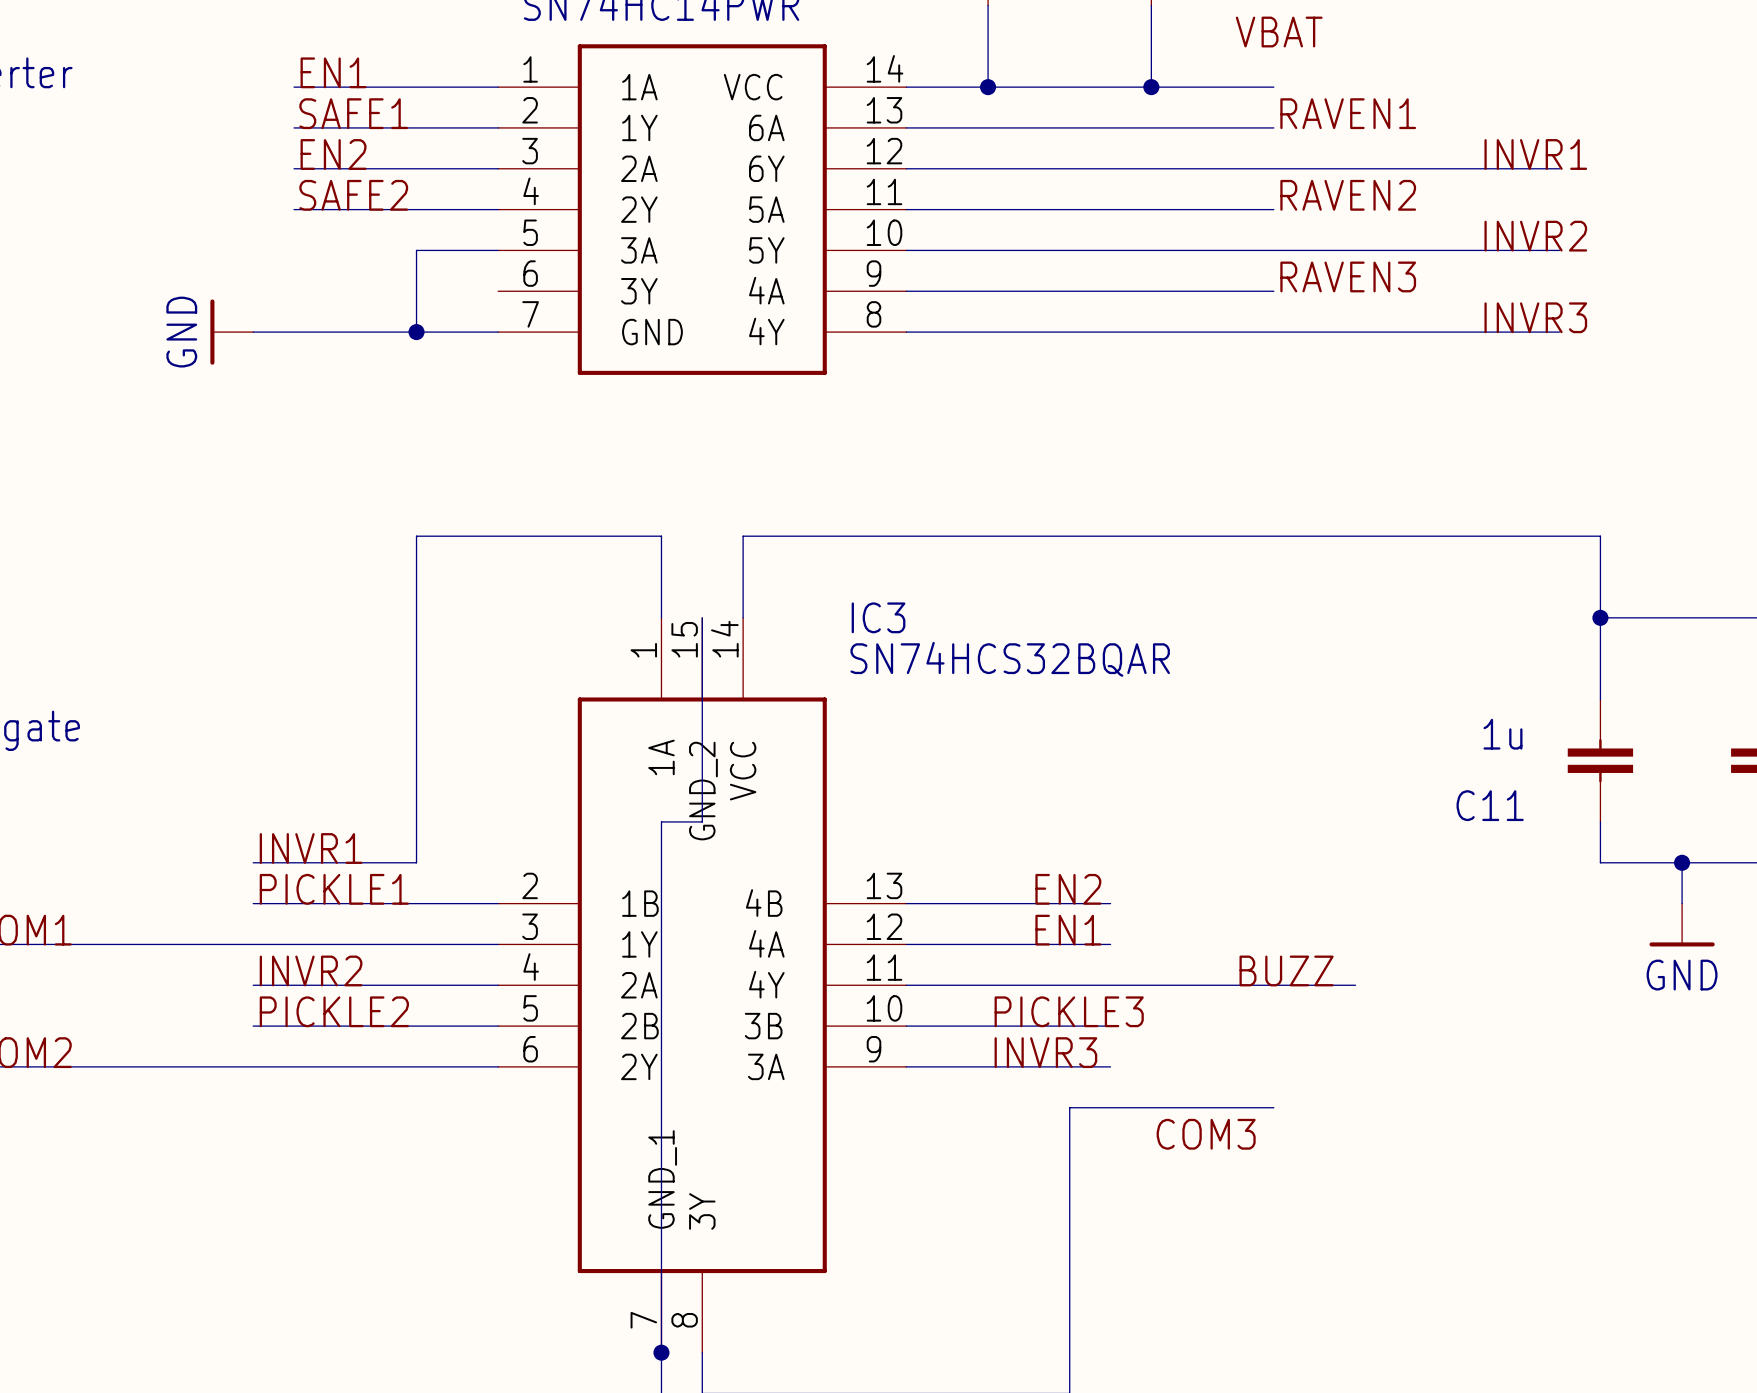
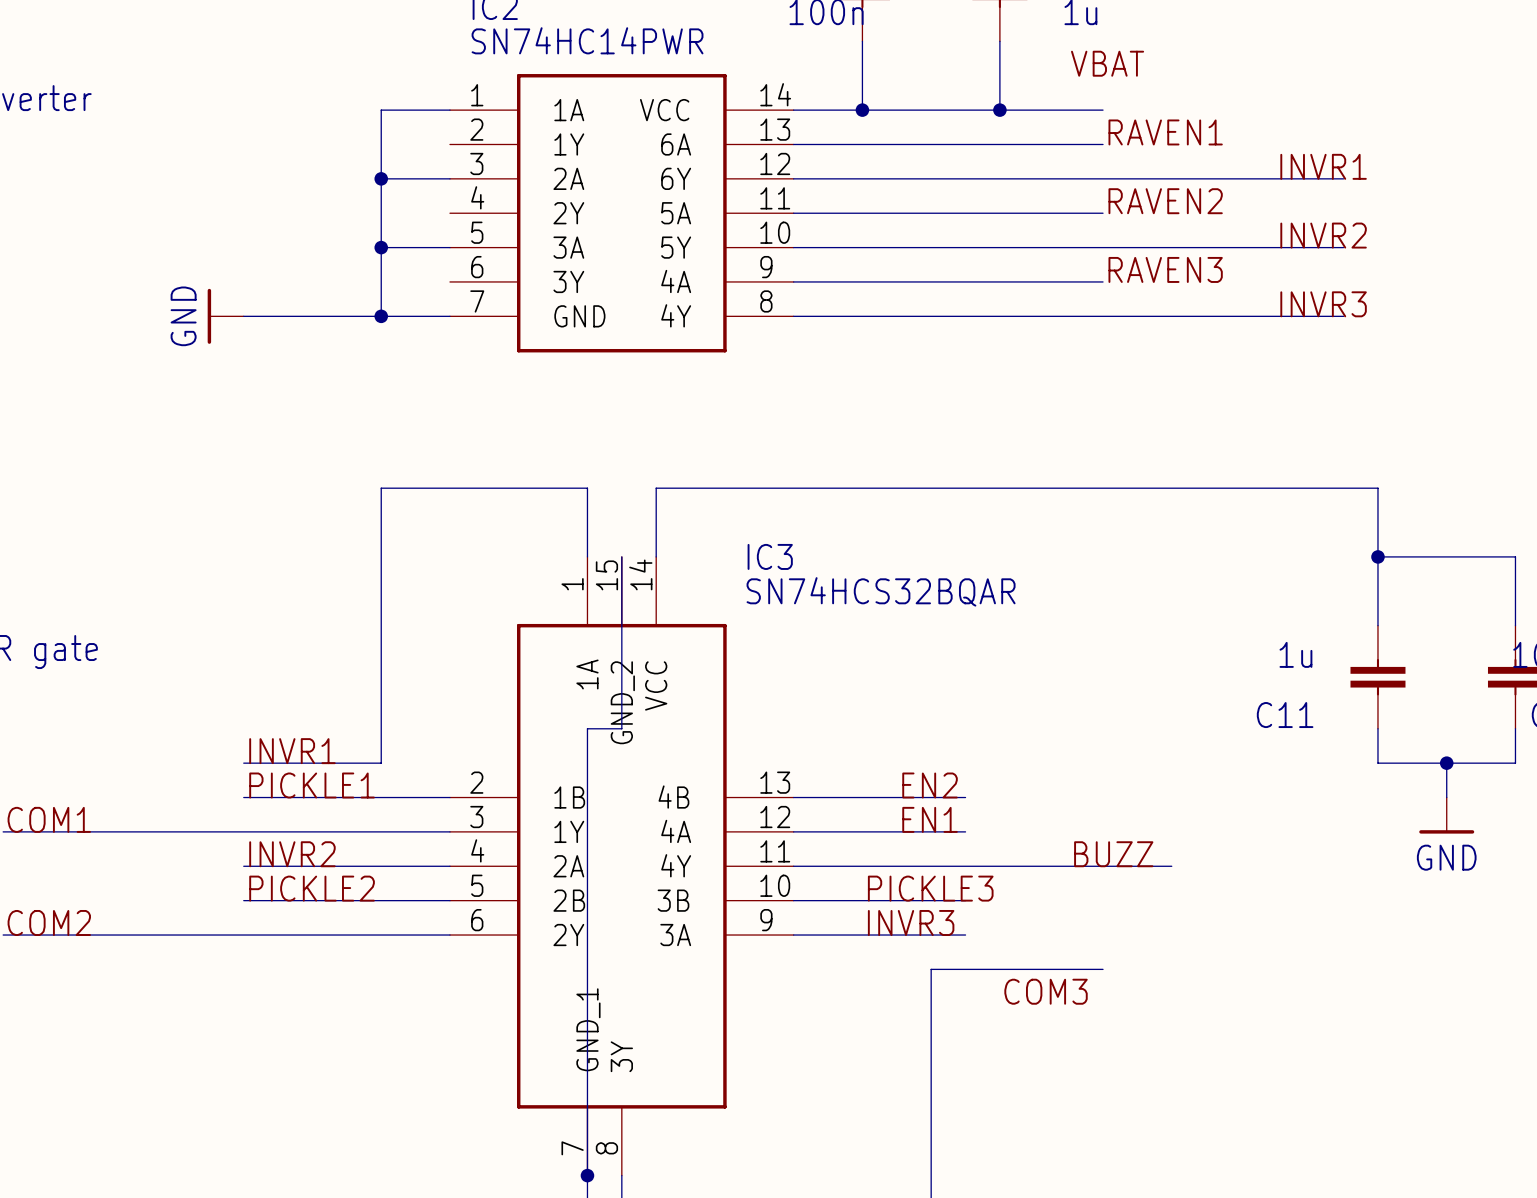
label: EN1 (333, 72) -> none
wire: (294, 87) (416, 87) -> (381, 247) (381, 110)
label: SAFE1 (353, 113) -> none
wire: (294, 127) (498, 127) -> none
label: EN2 (333, 154) -> none
wire: (294, 168) (416, 168) -> none
junction: none -> (381, 178)
label: SAFE2 (353, 195) -> none
wire: (294, 209) (498, 209) -> none
junction: none -> (381, 247)

